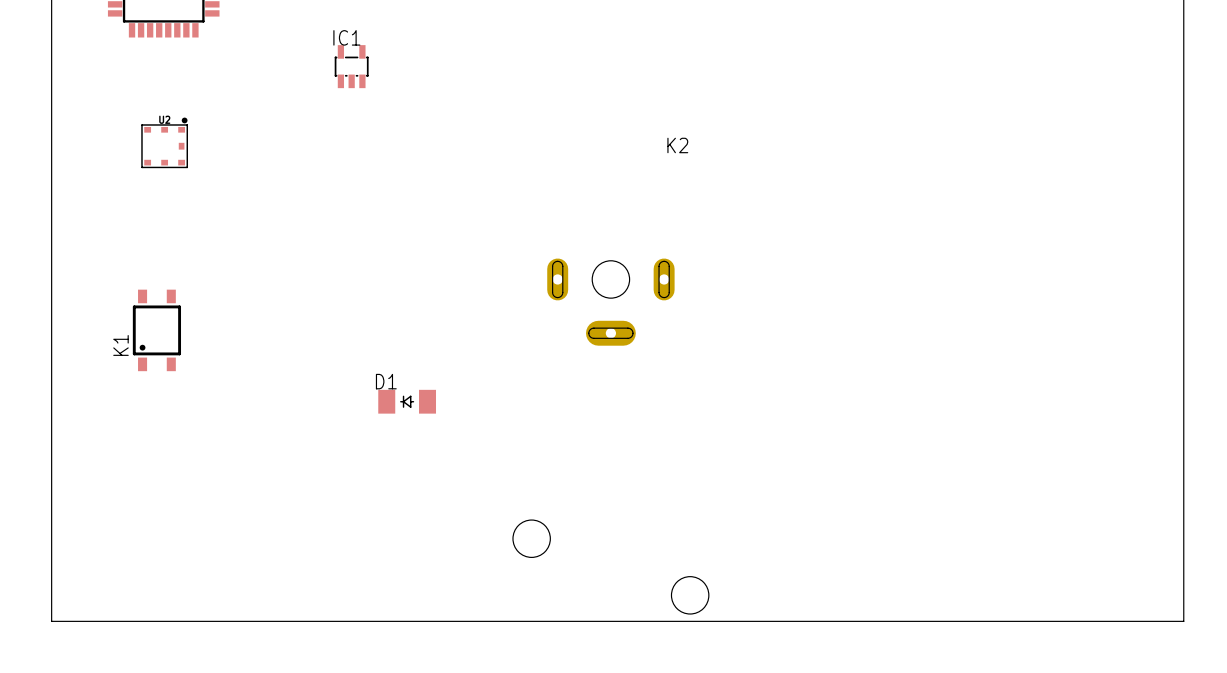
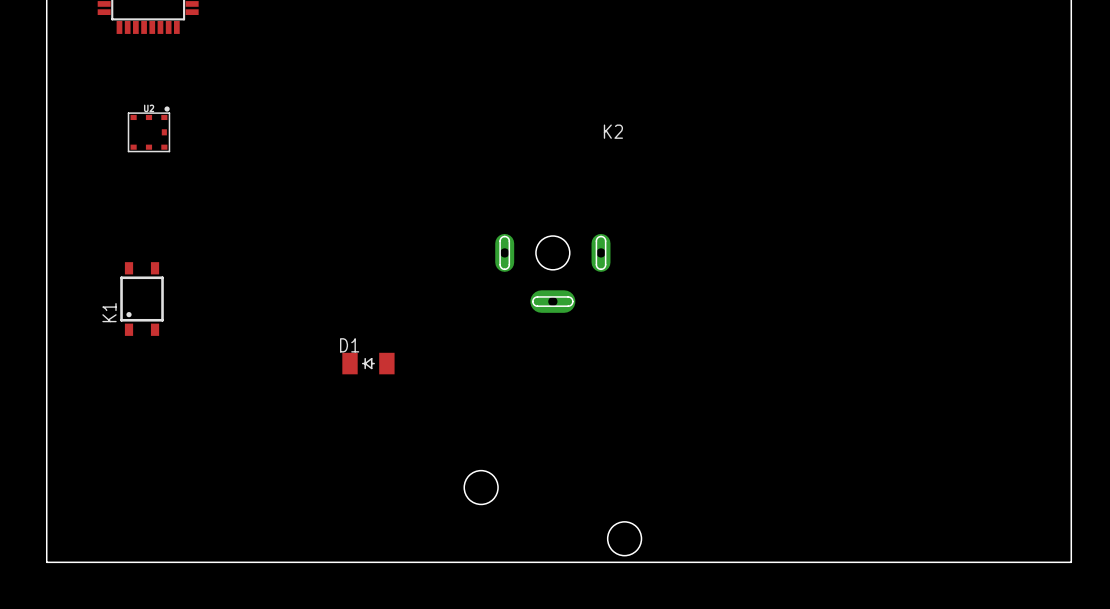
IC1: (351, 66) -> none

